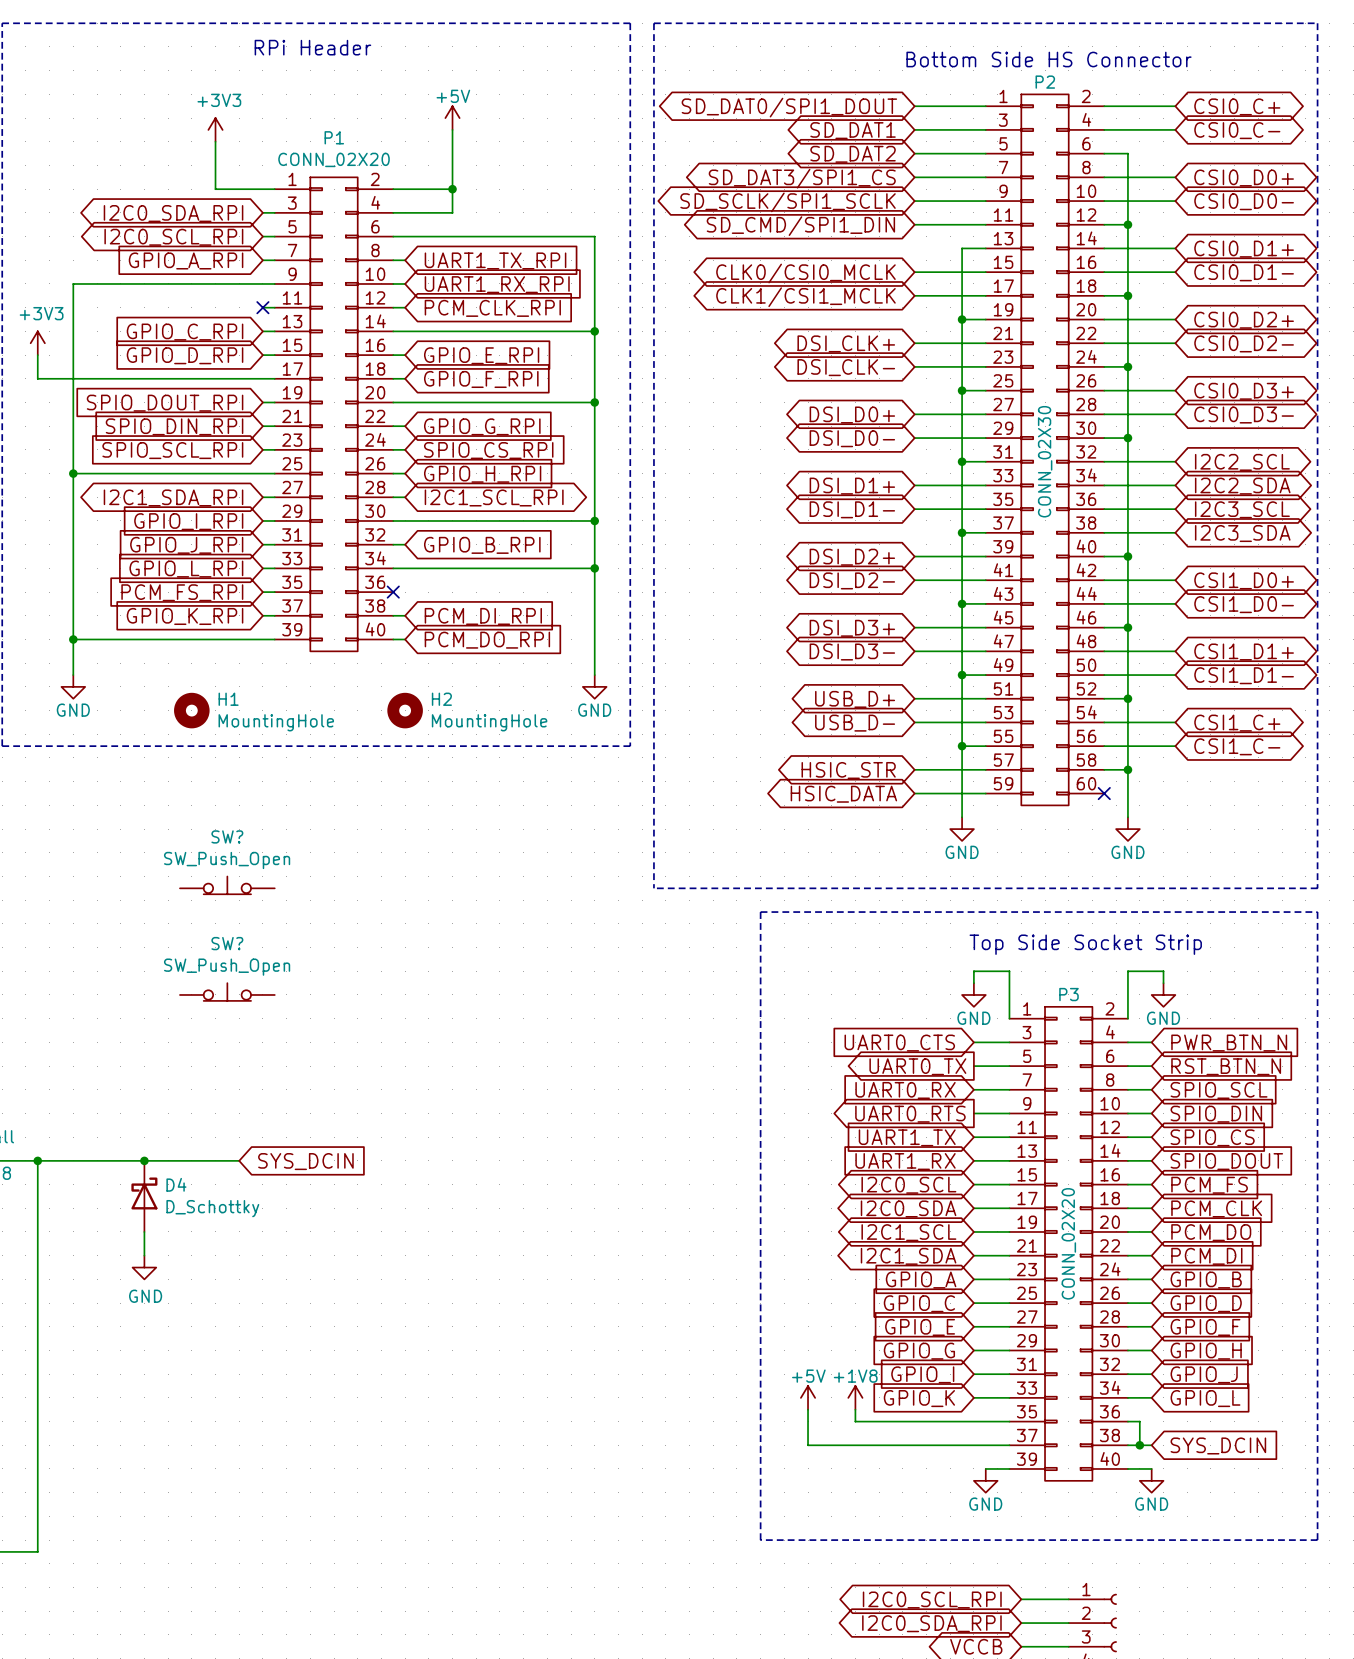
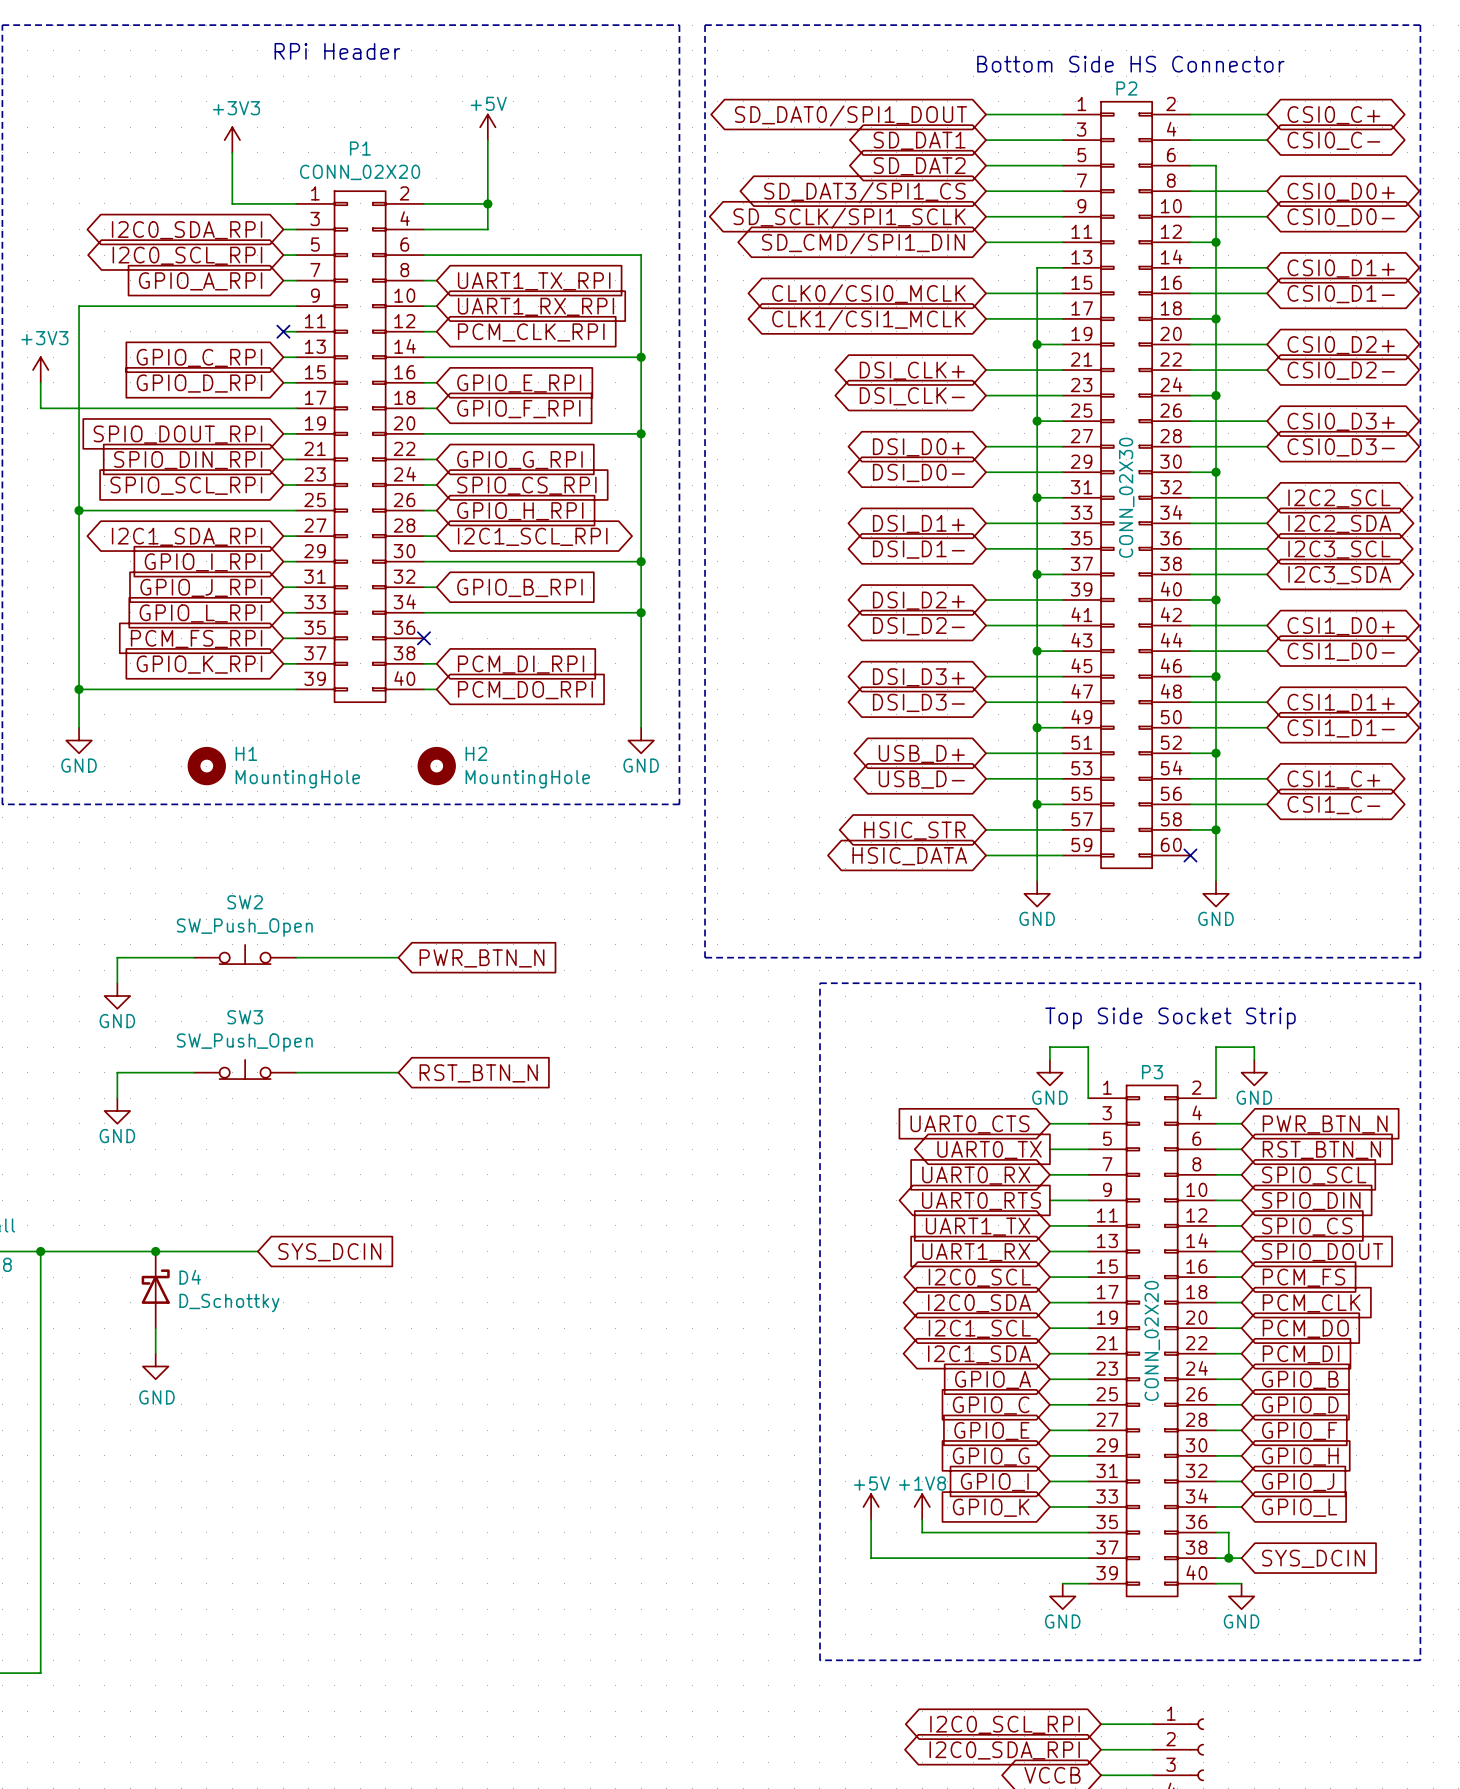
SW? name: SW? (227, 836) -> SW2 (245, 902)
wire: none -> (194, 957) (117, 957) (117, 983)
wire: none -> (296, 957) (398, 957)
global label: none -> PWR_BTN_N (482, 958)
power symbol: none -> GND (117, 996)
SW? name: SW? (227, 943) -> SW3 (245, 1017)
wire: none -> (194, 1072) (117, 1072) (117, 1098)
wire: none -> (296, 1072) (398, 1072)
global label: none -> RST_BTN_N (478, 1073)
power symbol: none -> GND (117, 1110)

